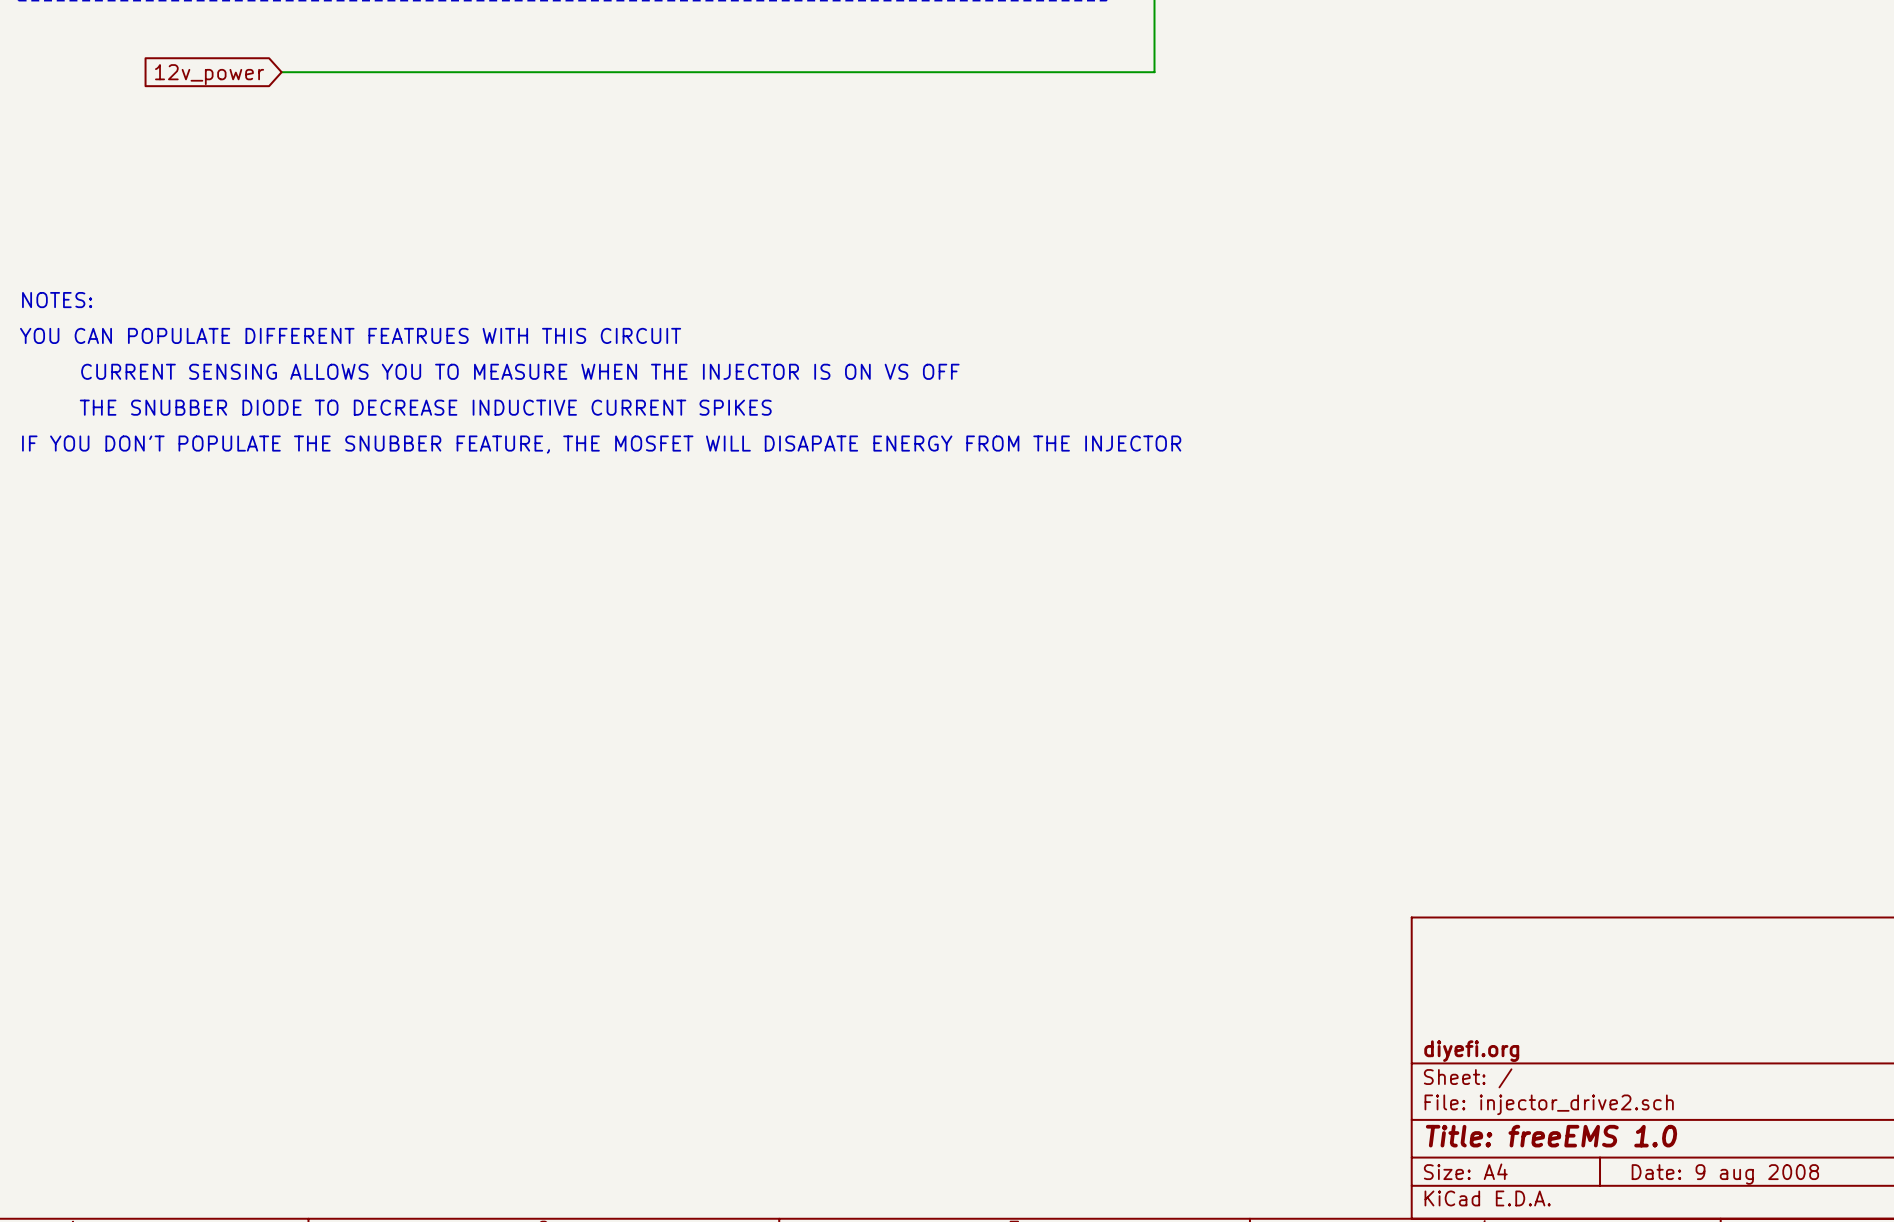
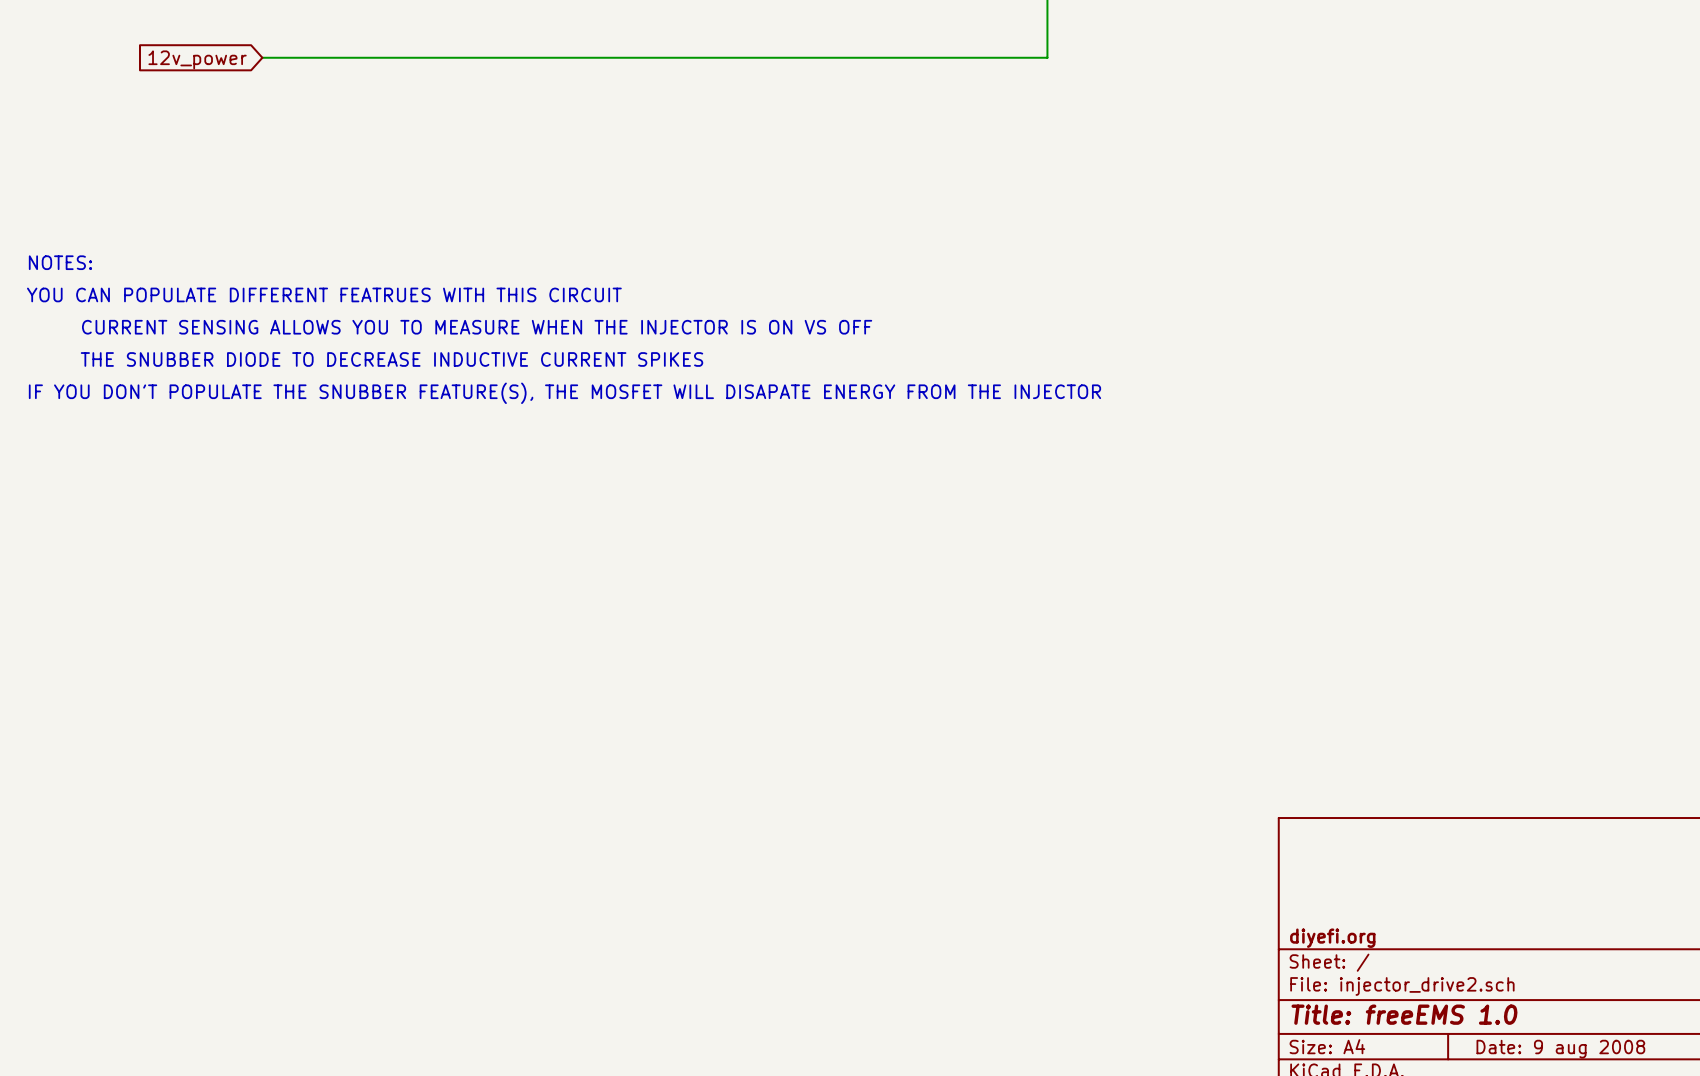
text: IF YOU DON'T POPULATE THE SNUBBER FEATURE, THE MOSFET WILL DISAPATE ENERGY FROM THE INJECTOR (601, 444) -> IF YOU DON'T POPULATE THE SNUBBER FEATURE(S), THE MOSFET WILL DISAPATE ENERGY FROM THE INJECTOR (564, 393)

